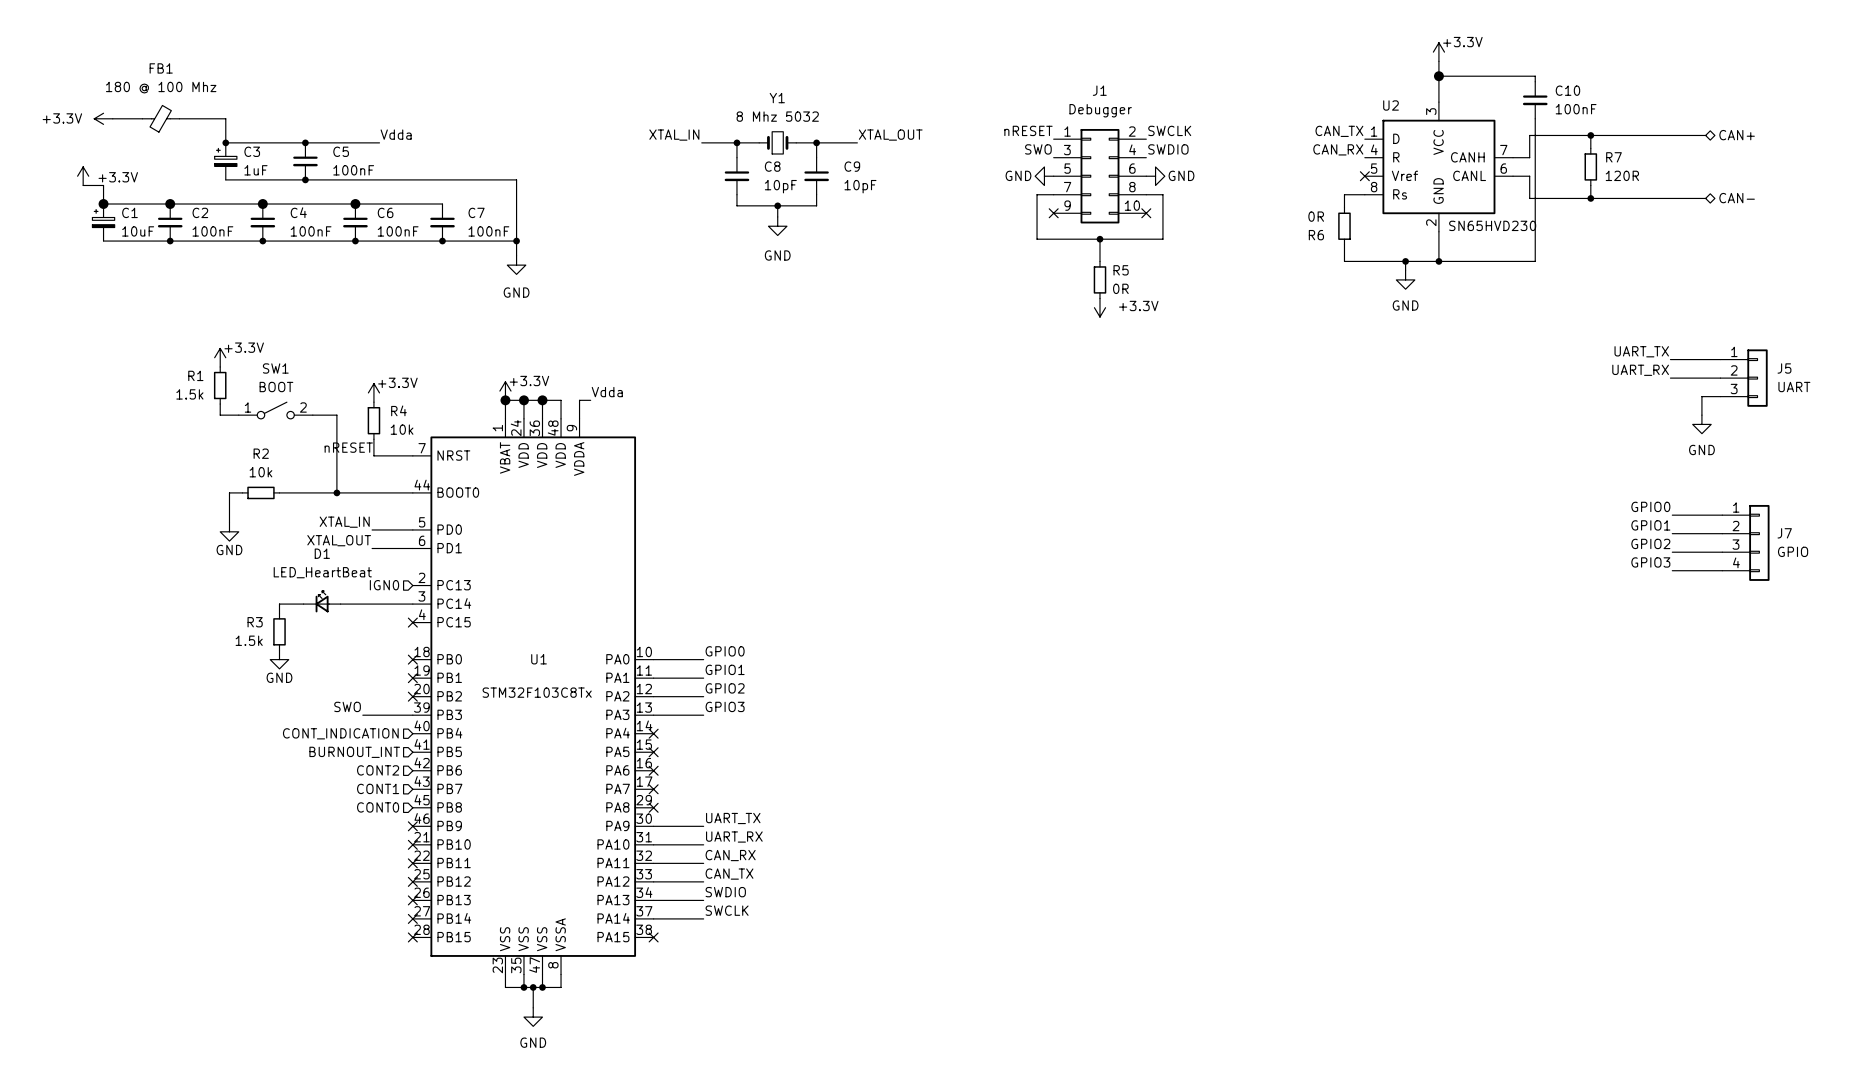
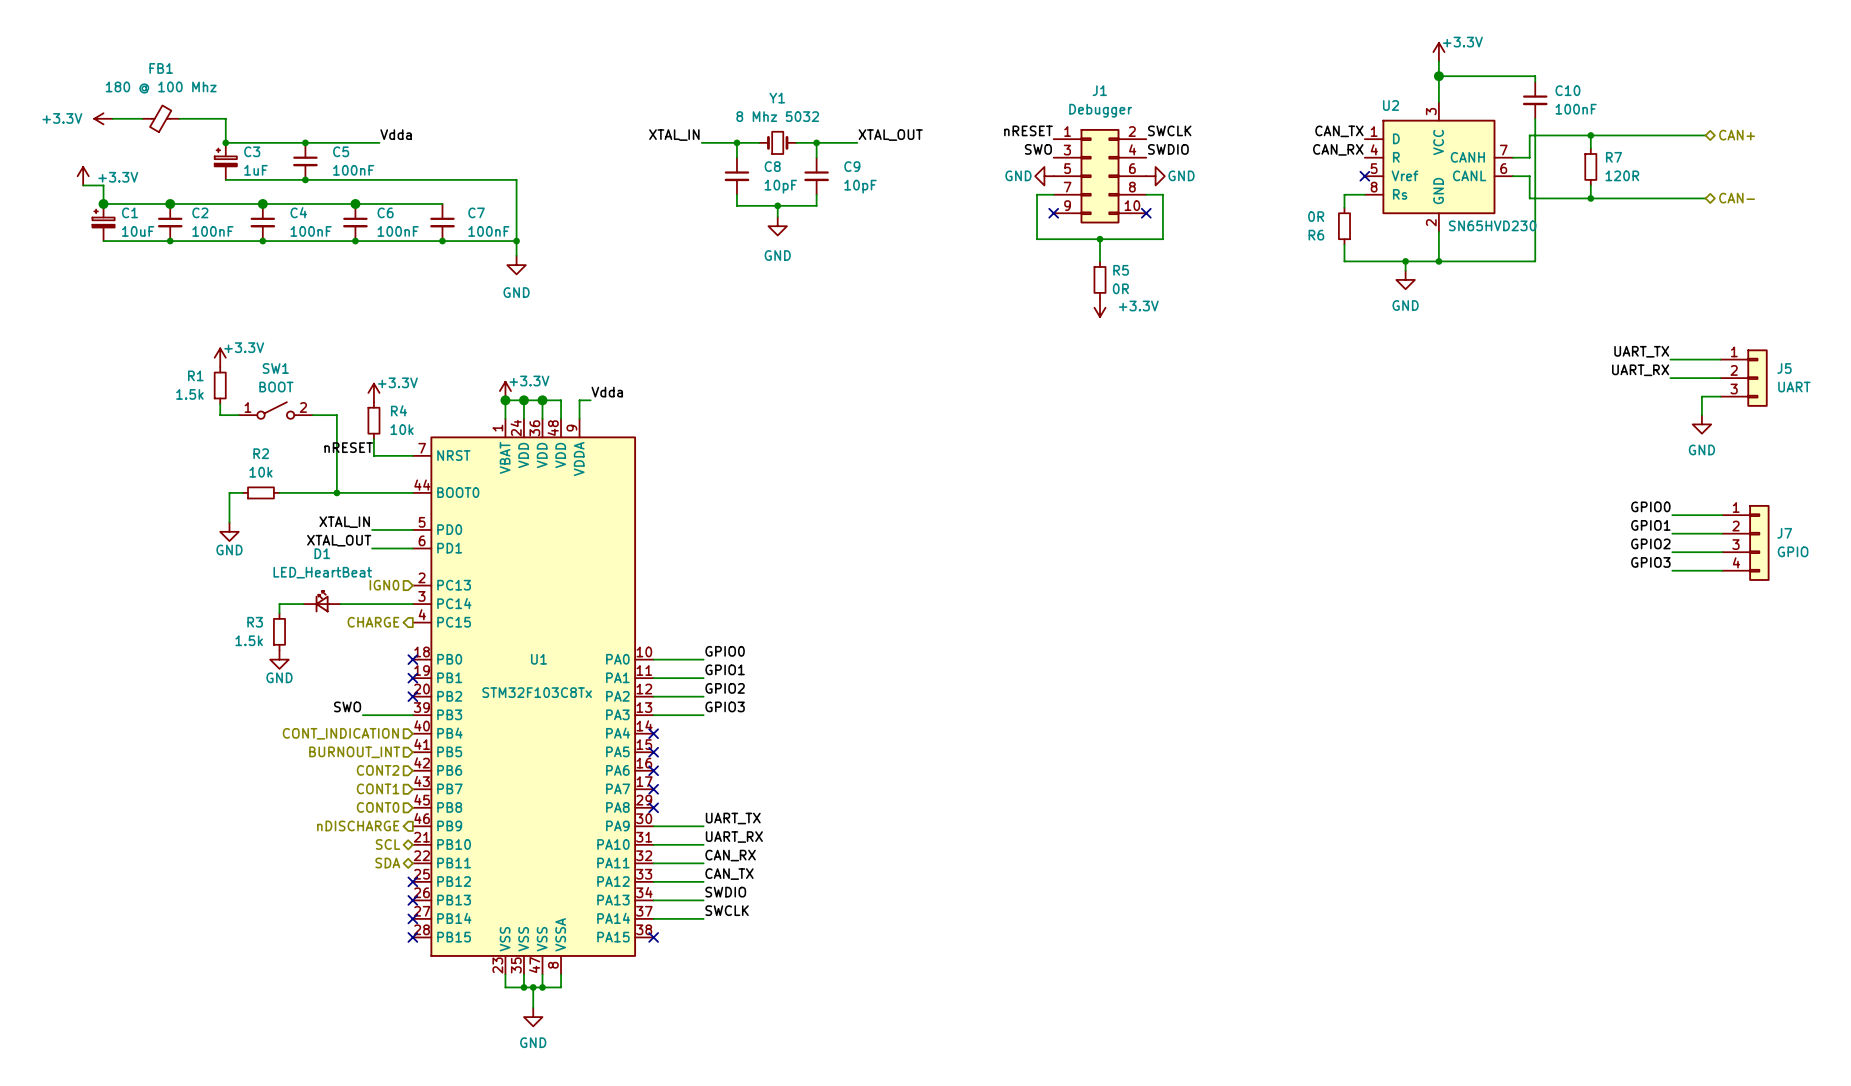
hierarchical label: none -> CHARGE (373, 622)
no-connect mark: (412, 622) -> none
hierarchical label: none -> nDISCHARGE (358, 825)
no-connect mark: (412, 826) -> none
hierarchical label: none -> SCL (388, 844)
no-connect mark: (412, 844) -> none
hierarchical label: none -> SDA (387, 863)
no-connect mark: (412, 863) -> none

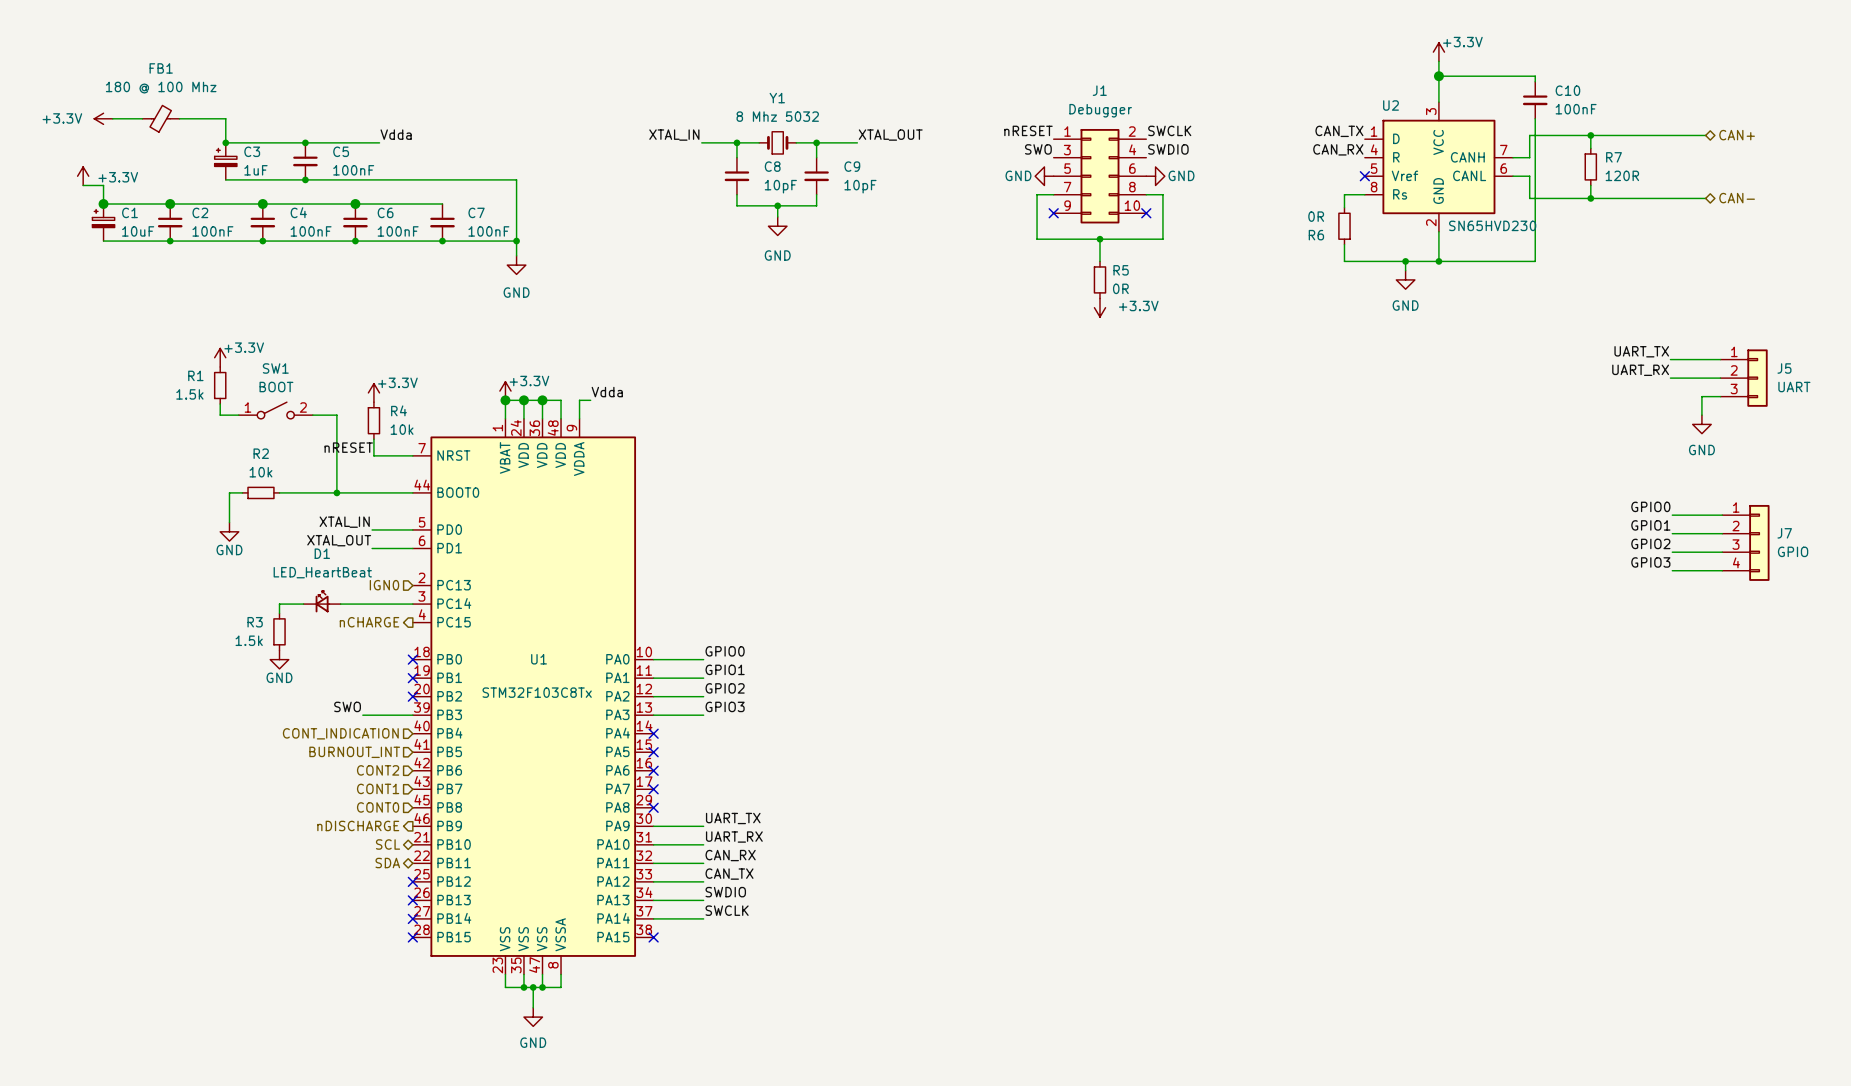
hierarchical label: CHARGE (373, 622) -> nCHARGE (369, 622)

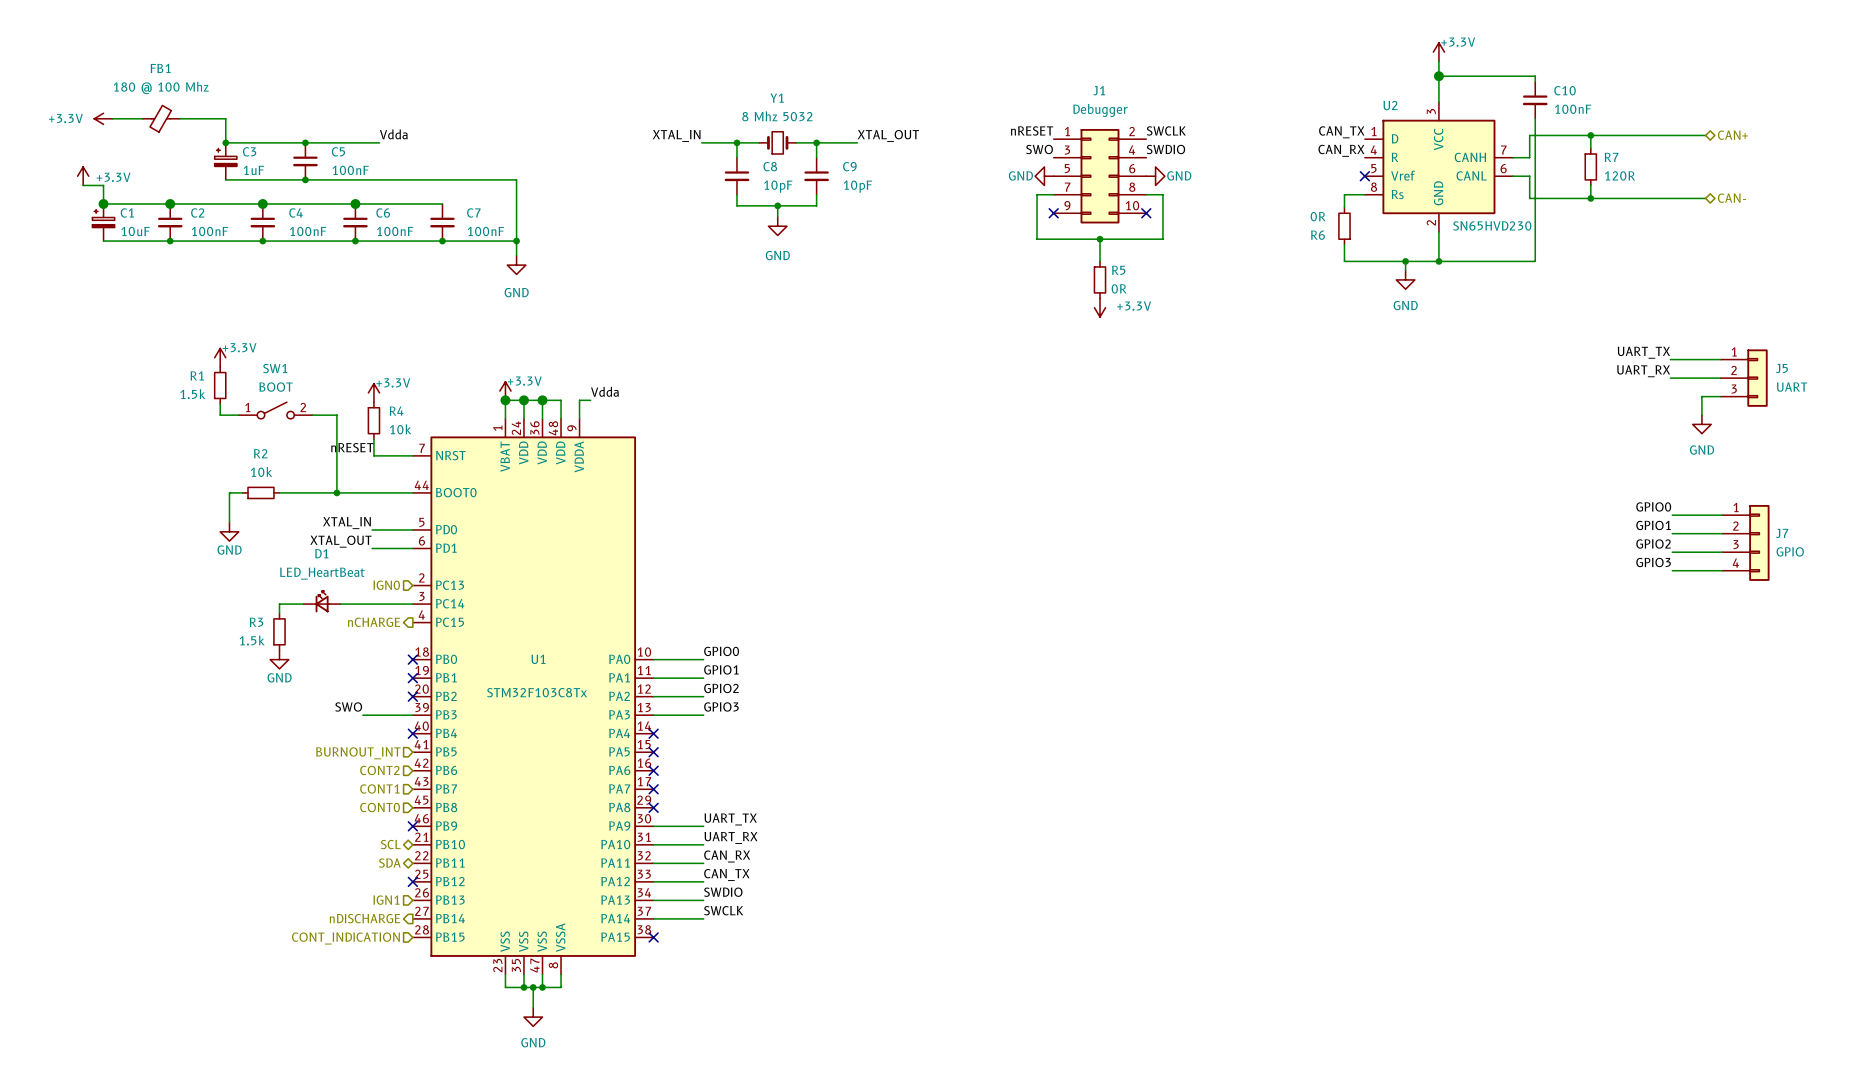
hierarchical label: CONT_INDICATION (340, 733) -> none
no-connect mark: none -> (412, 733)
hierarchical label position: nDISCHARGE (358, 825) -> nDISCHARGE (364, 918)
no-connect mark: none -> (412, 826)
hierarchical label: none -> IGN1 (386, 900)
no-connect mark: (412, 900) -> none
no-connect mark: (412, 918) -> none
hierarchical label: none -> CONT_INDICATION (345, 938)
no-connect mark: (412, 937) -> none

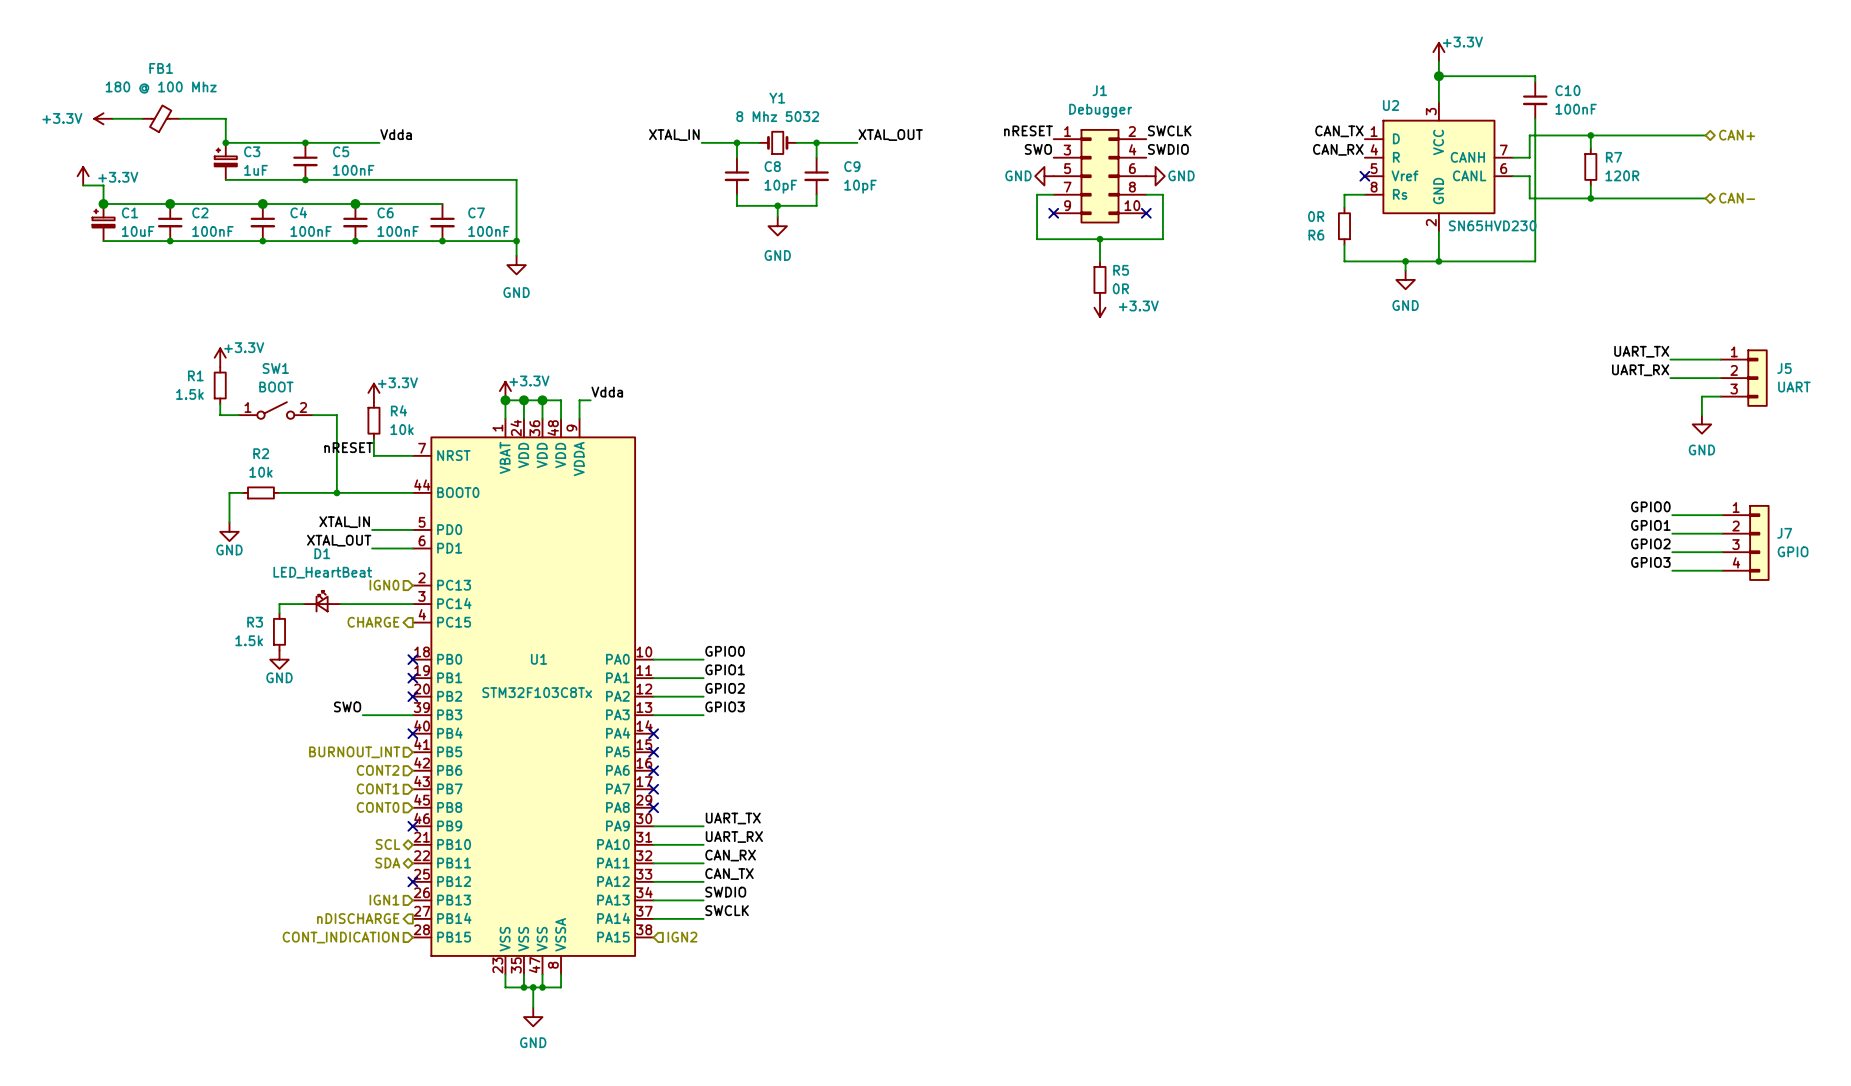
hierarchical label: nCHARGE (374, 622) -> CHARGE (373, 622)
no-connect mark: (653, 937) -> none
hierarchical label: none -> IGN2 (682, 937)

